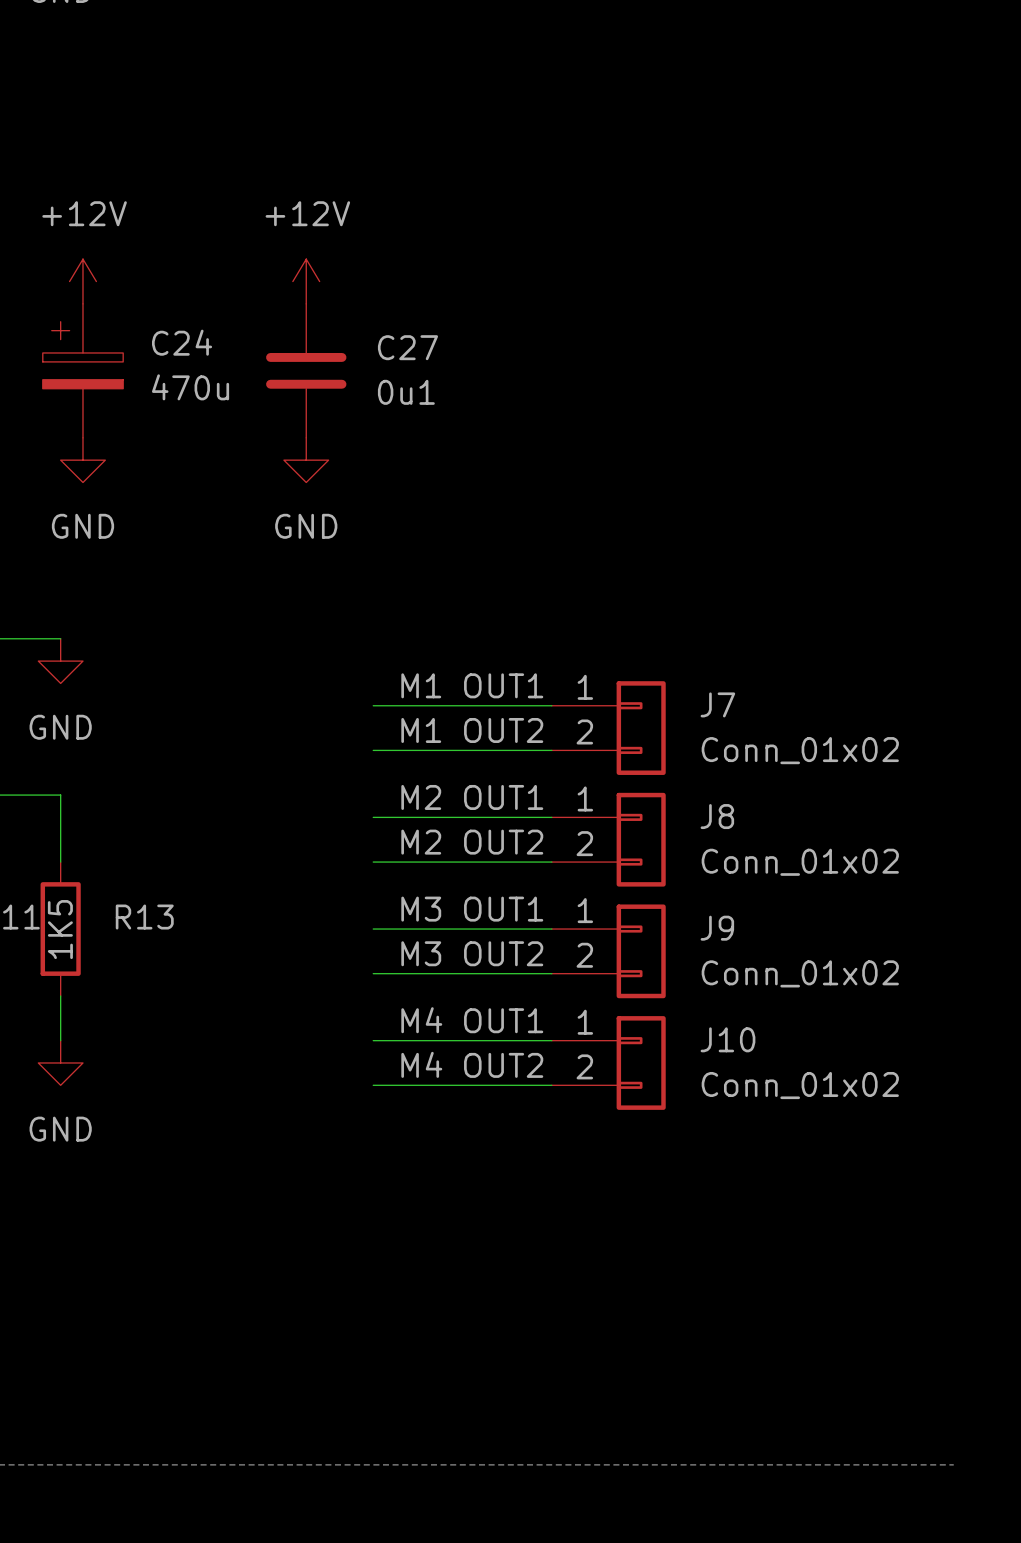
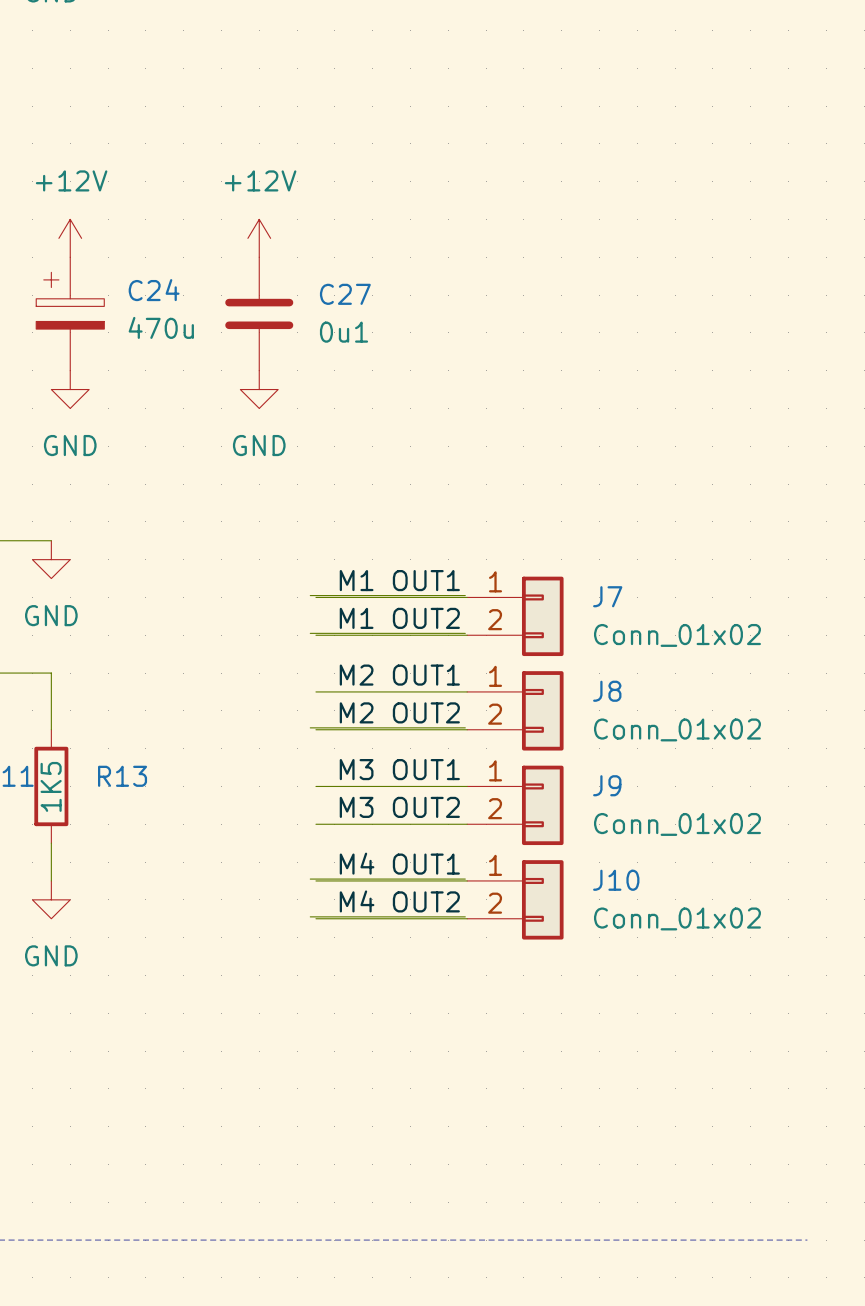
wire: none -> (310, 595) (465, 595)
wire: none -> (310, 633) (465, 633)
wire: none -> (310, 727) (465, 727)
wire: none -> (310, 879) (465, 879)
wire: none -> (310, 916) (465, 916)

